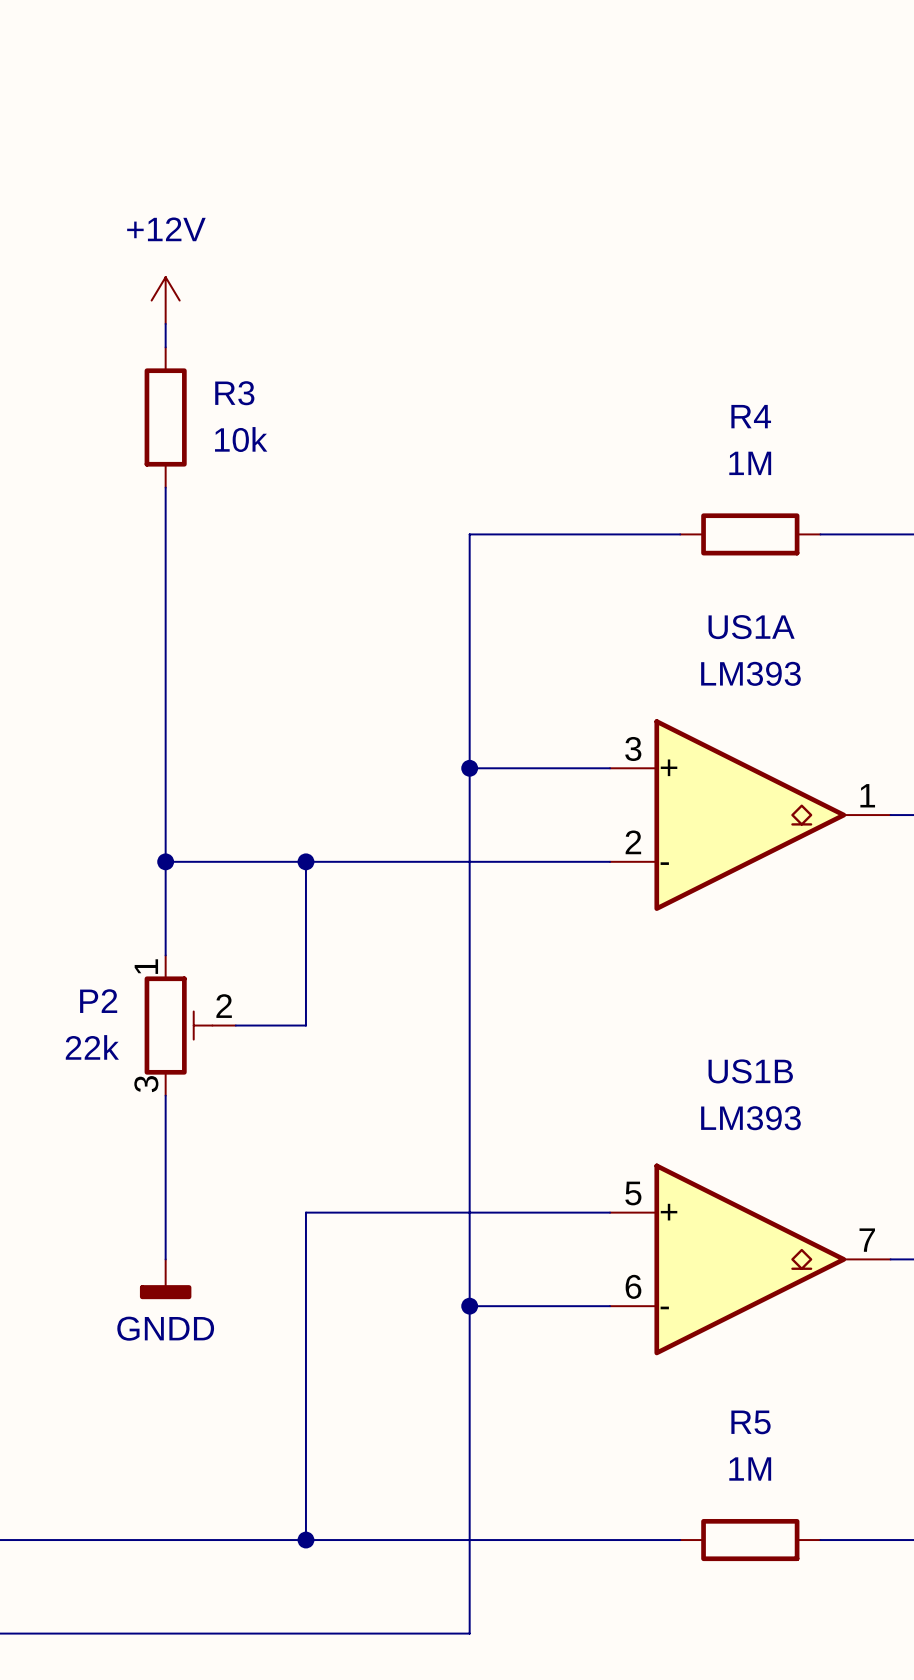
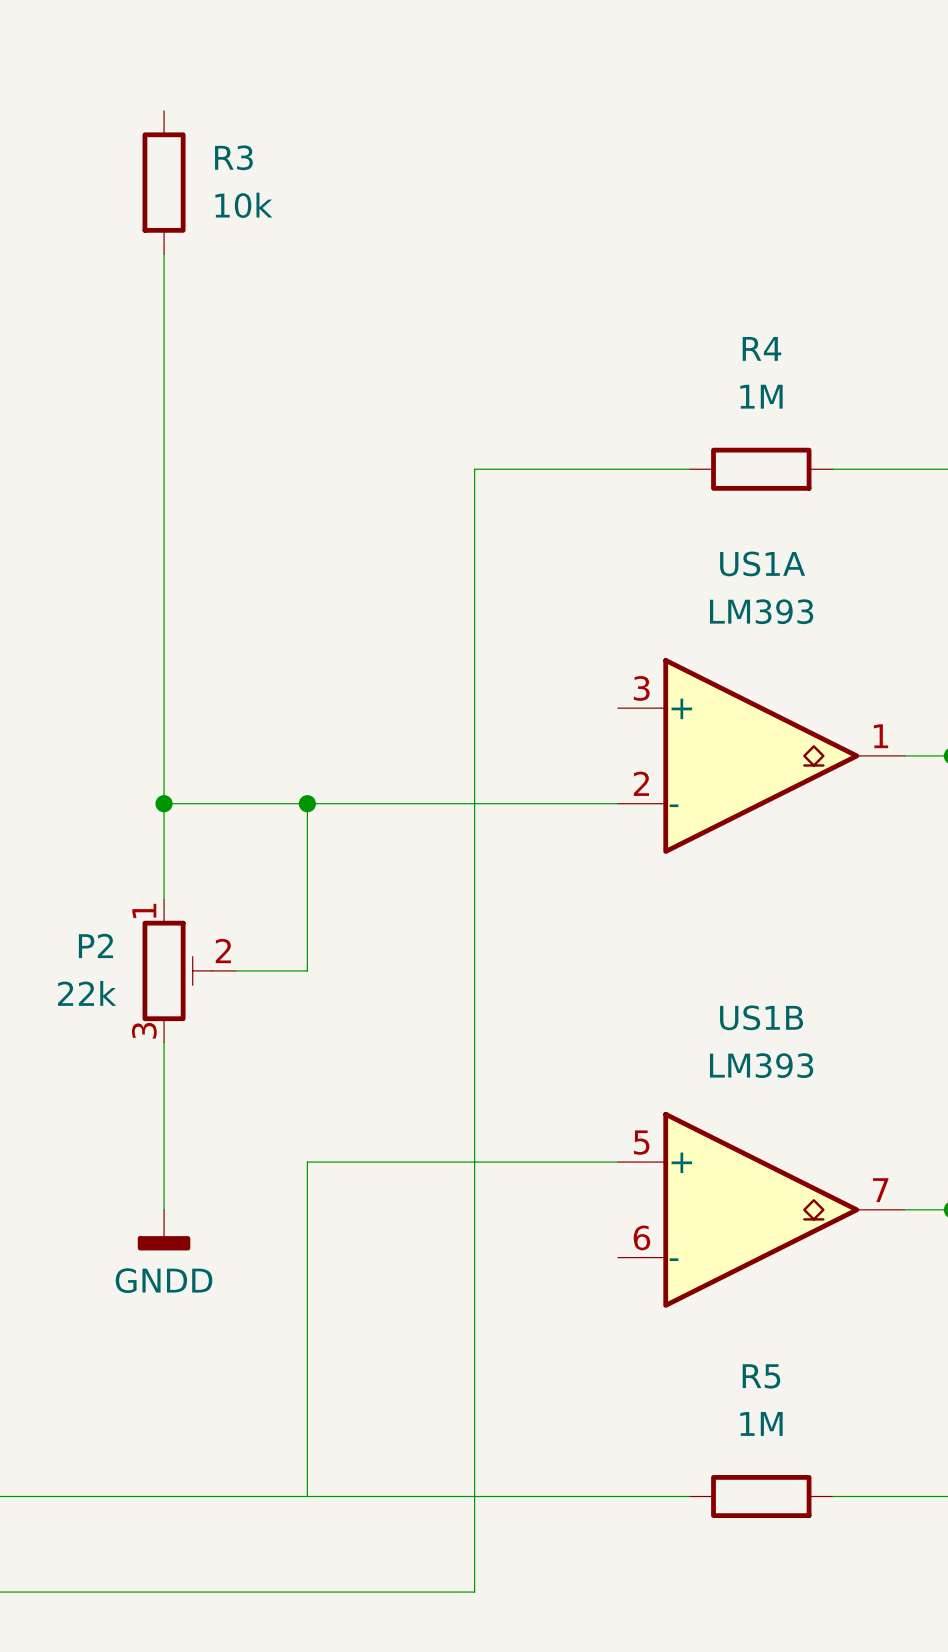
power symbol: +12V (165, 300) -> none
wire: none -> (164, 278) (164, 421)
R3 position: (165, 417) -> (164, 182)
wire: (469, 768) (610, 768) -> none
junction: (469, 768) -> none
wire: (469, 1306) (610, 1306) -> none
junction: (469, 1306) -> none
junction: (305, 1540) -> none

